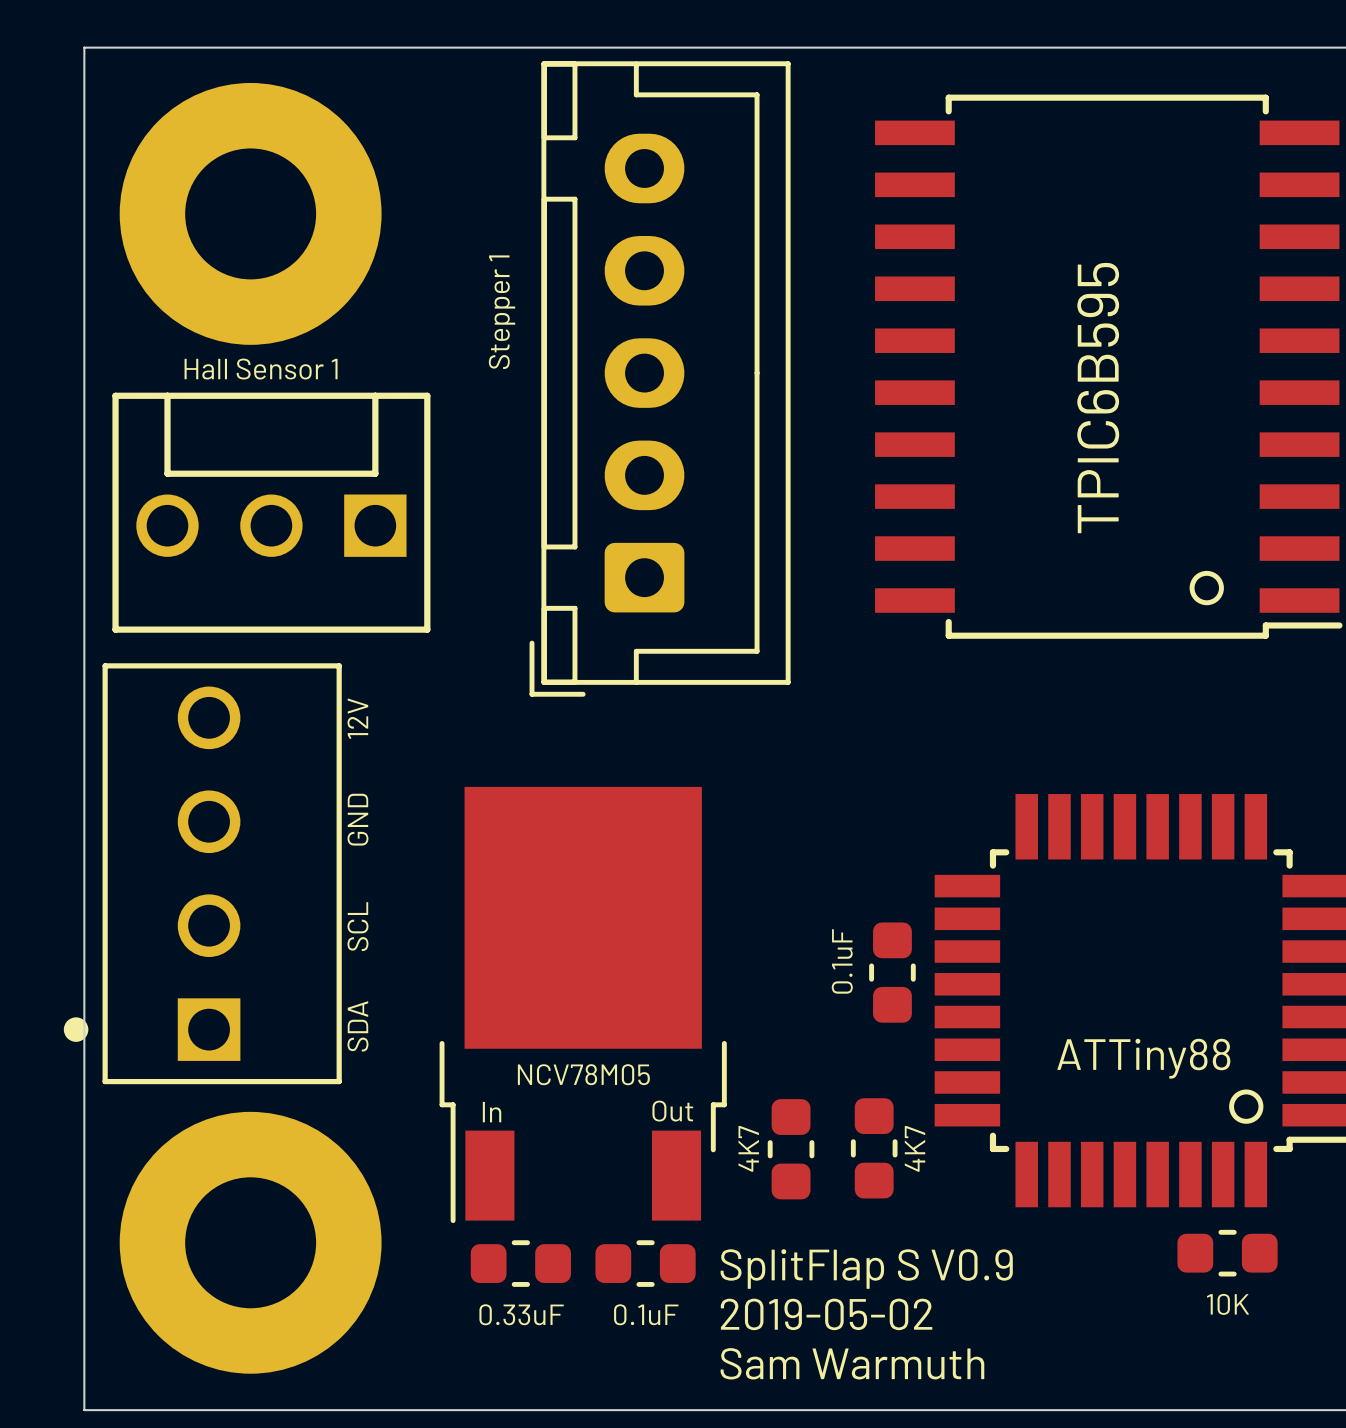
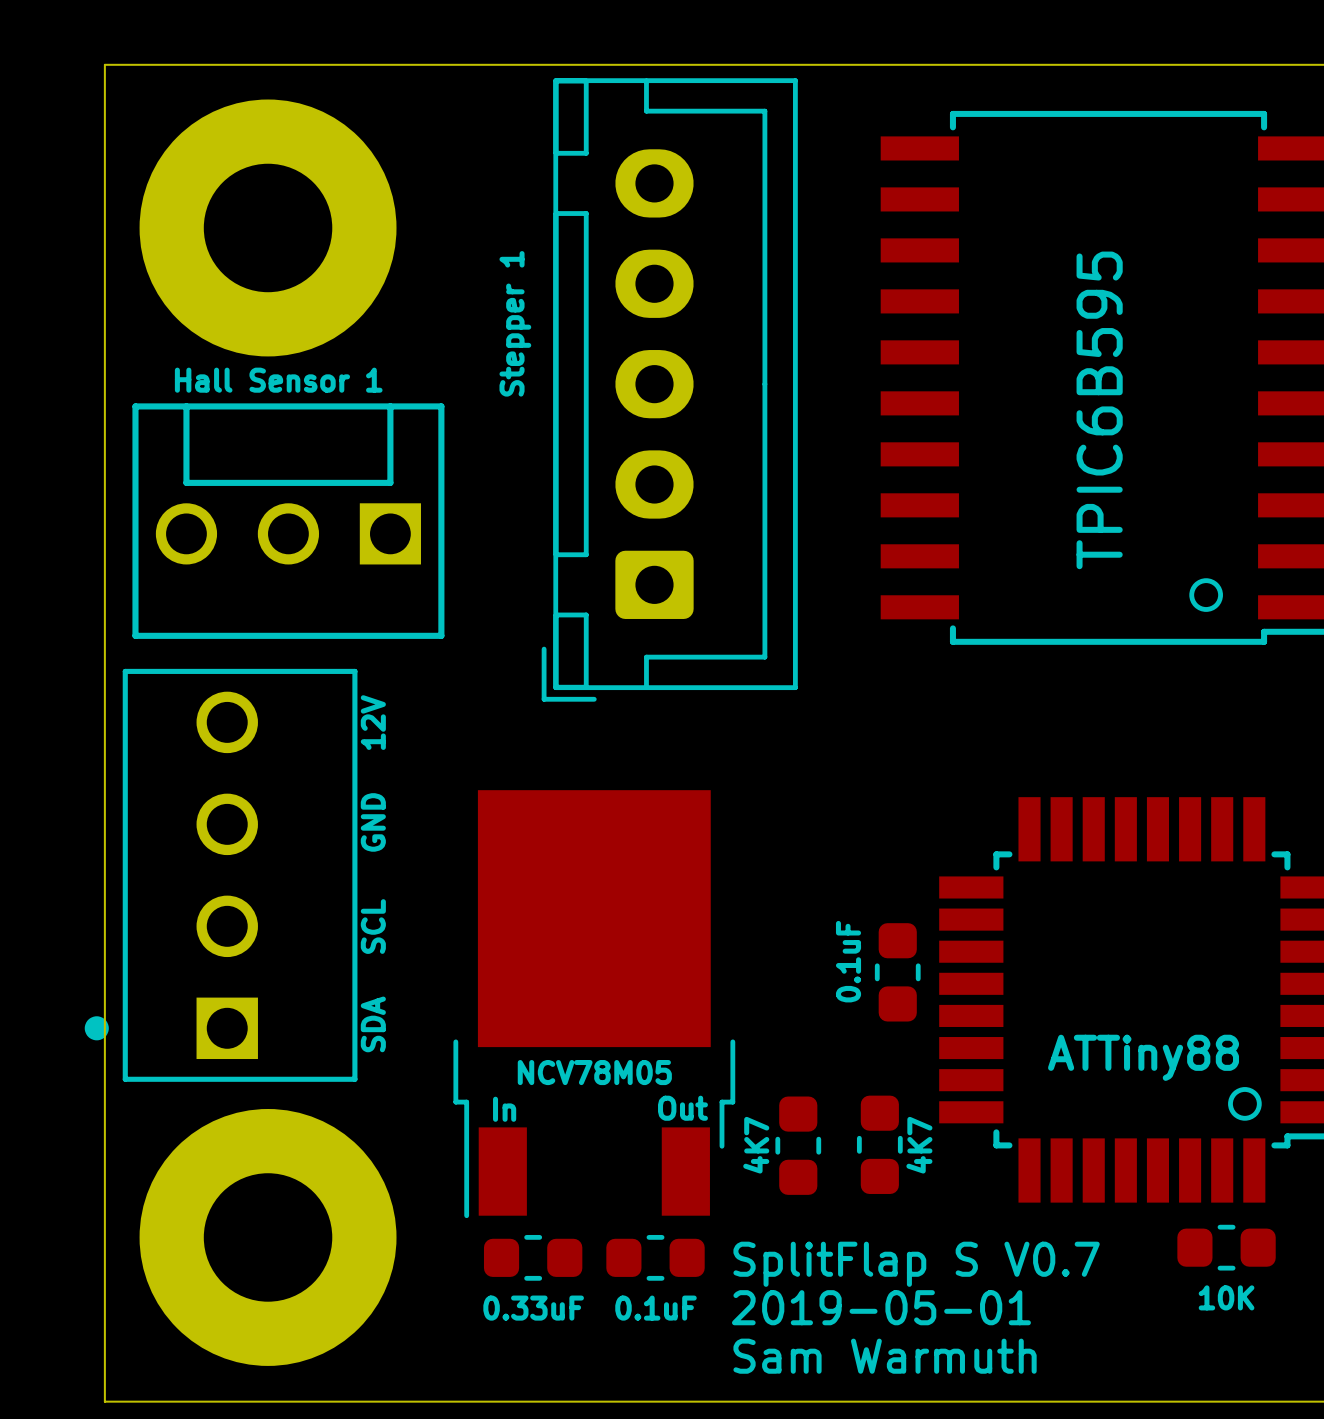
text: SplitFlap S V0.9 (866, 1269) -> SplitFlap S V0.7 (916, 1264)
text: 2019-05-02 (826, 1314) -> 2019-05-01 (881, 1307)

